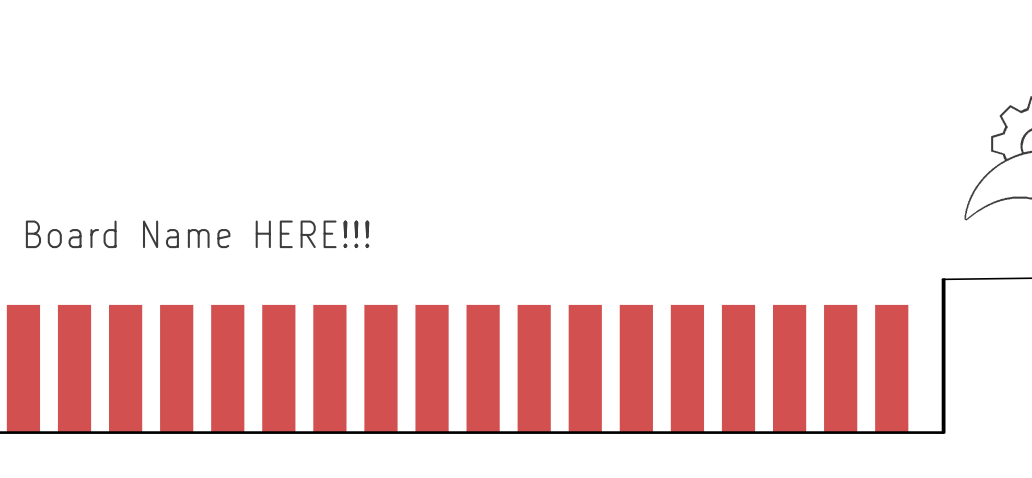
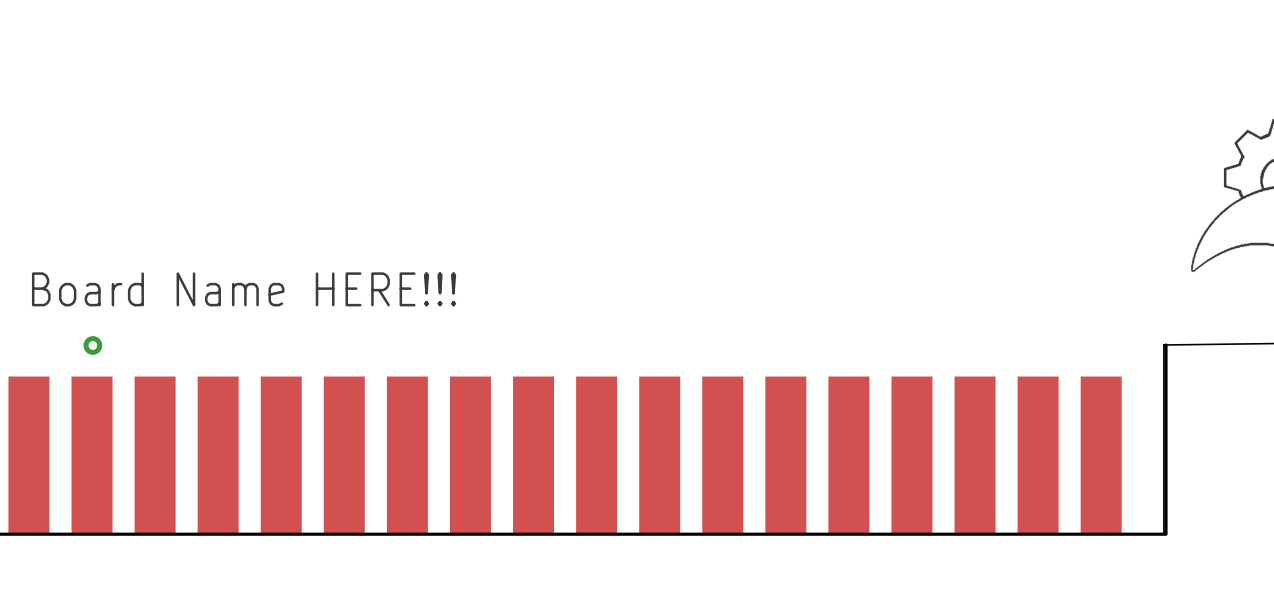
via: none -> (92, 345)

